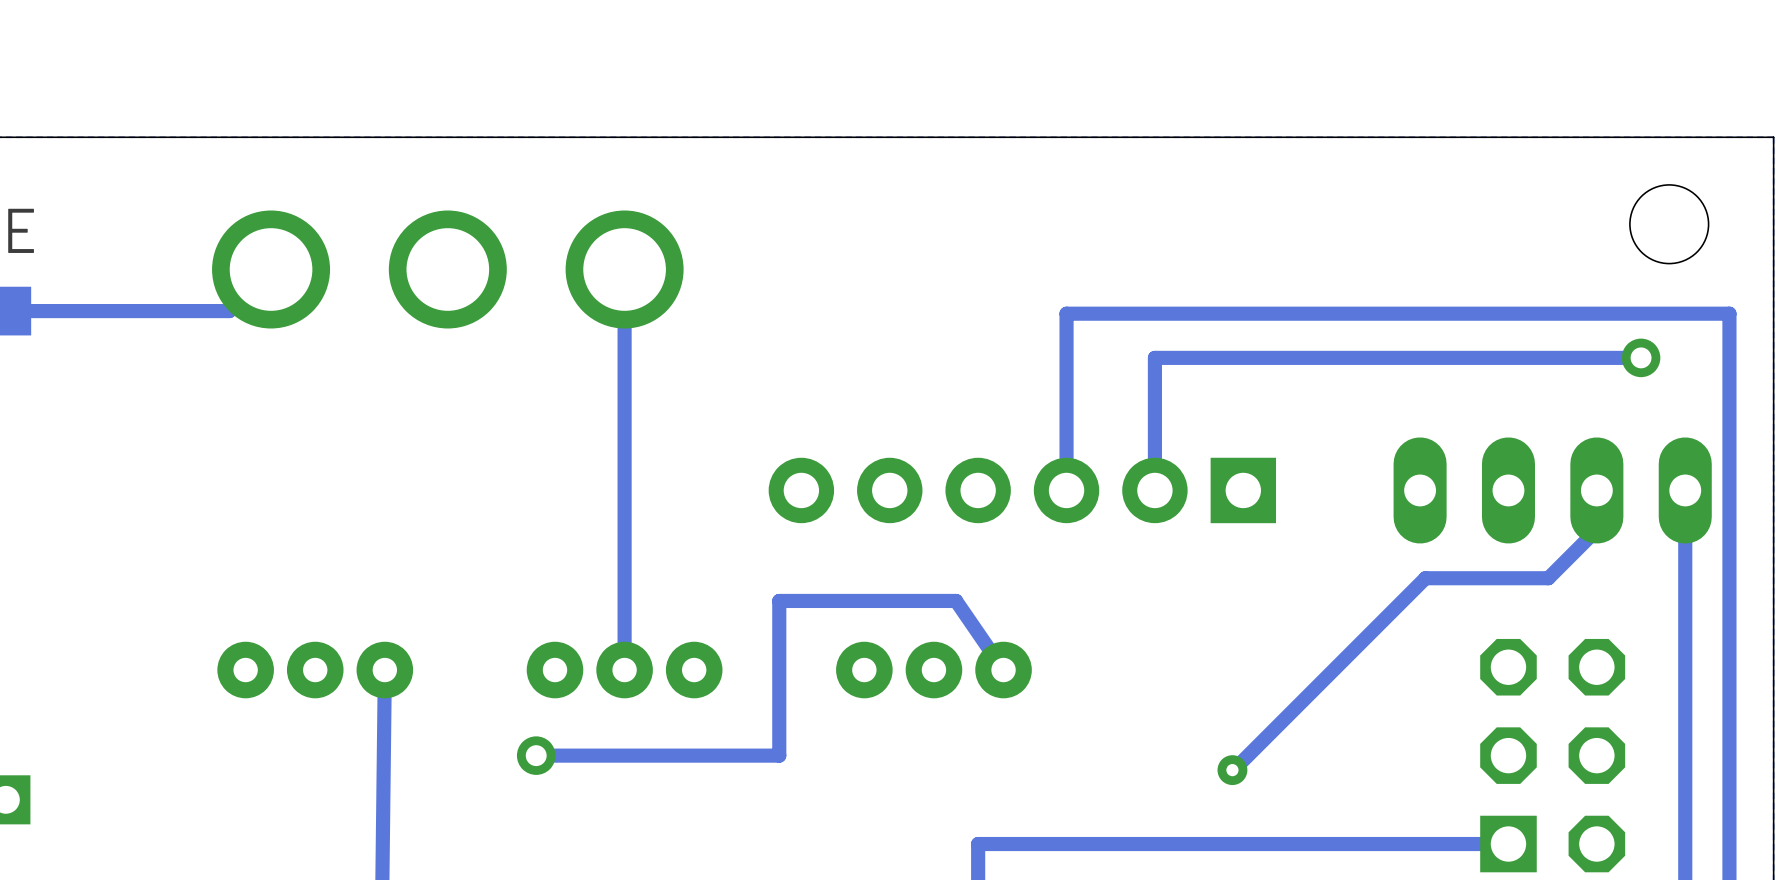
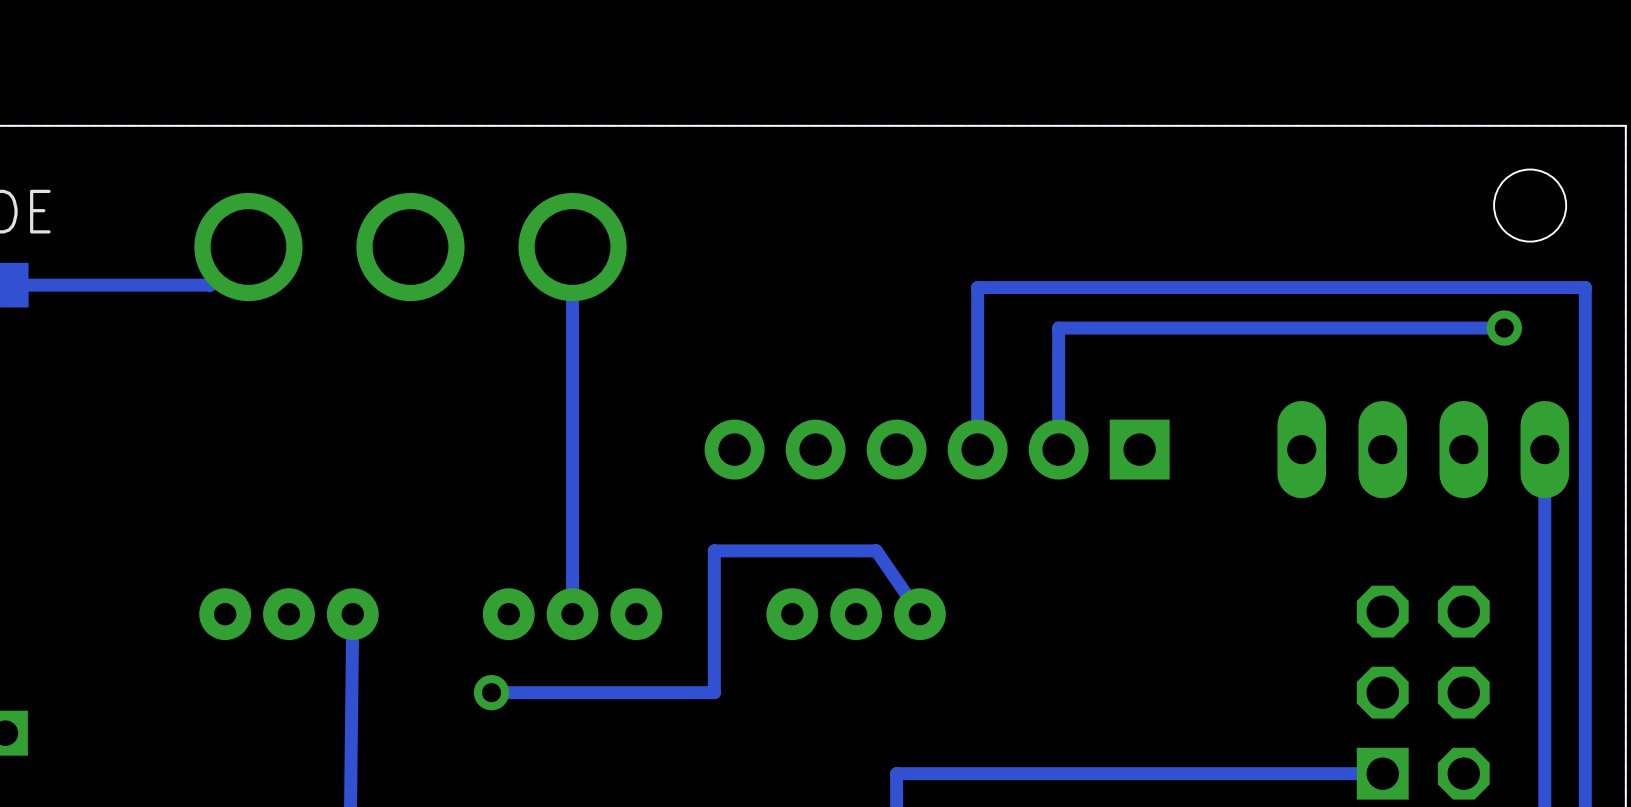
track: (1596, 490) (1596, 529) (1548, 578) (1425, 578) (1232, 770) -> none
via: (1232, 770) -> none

